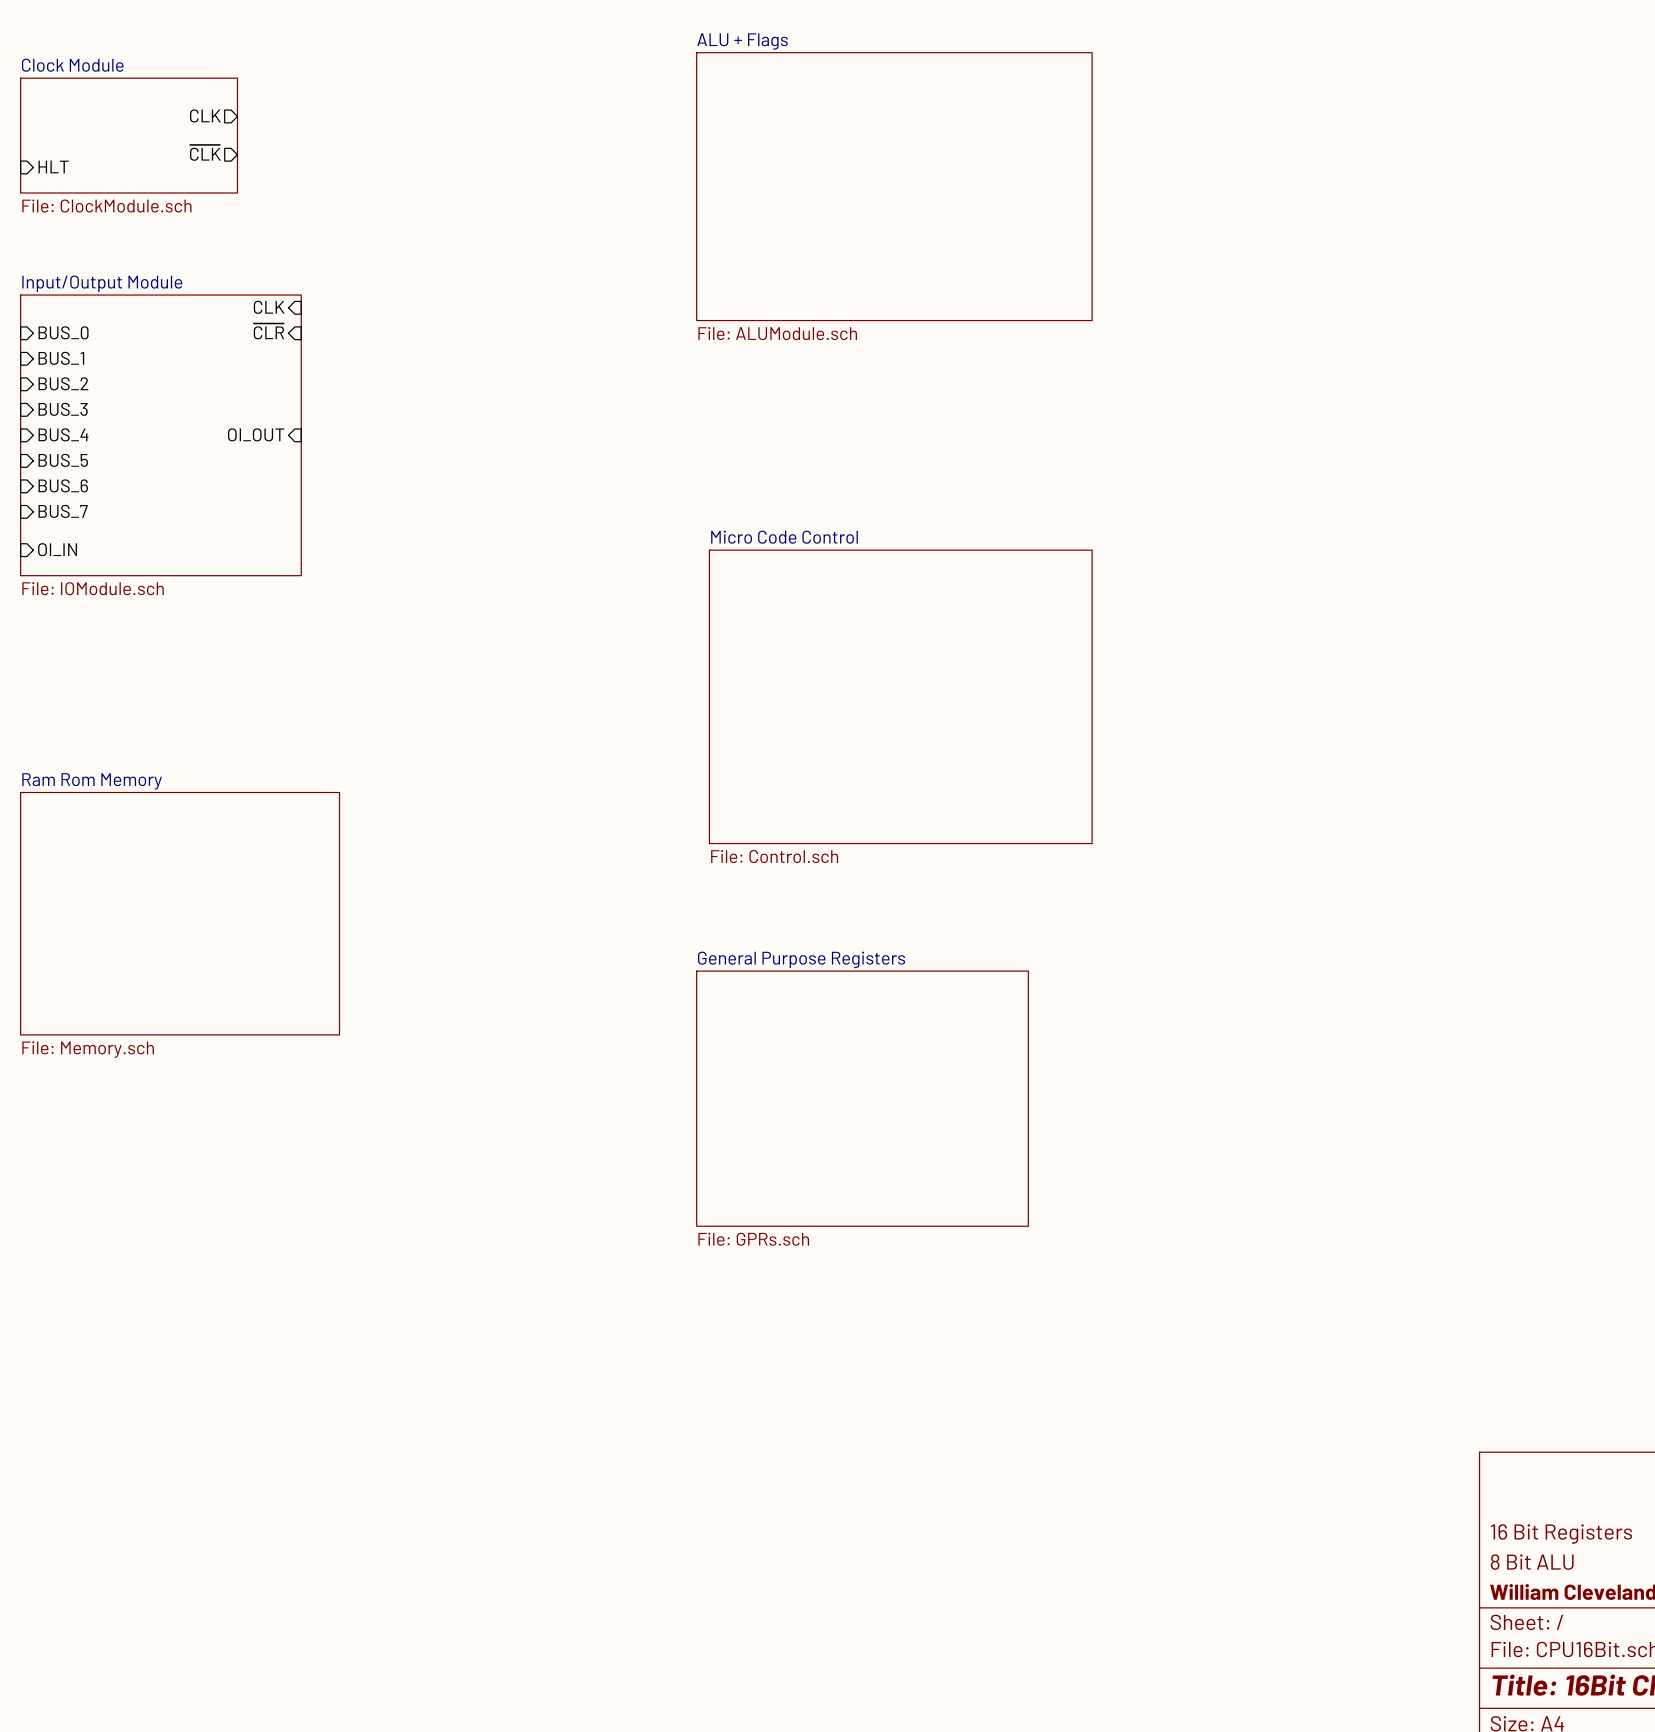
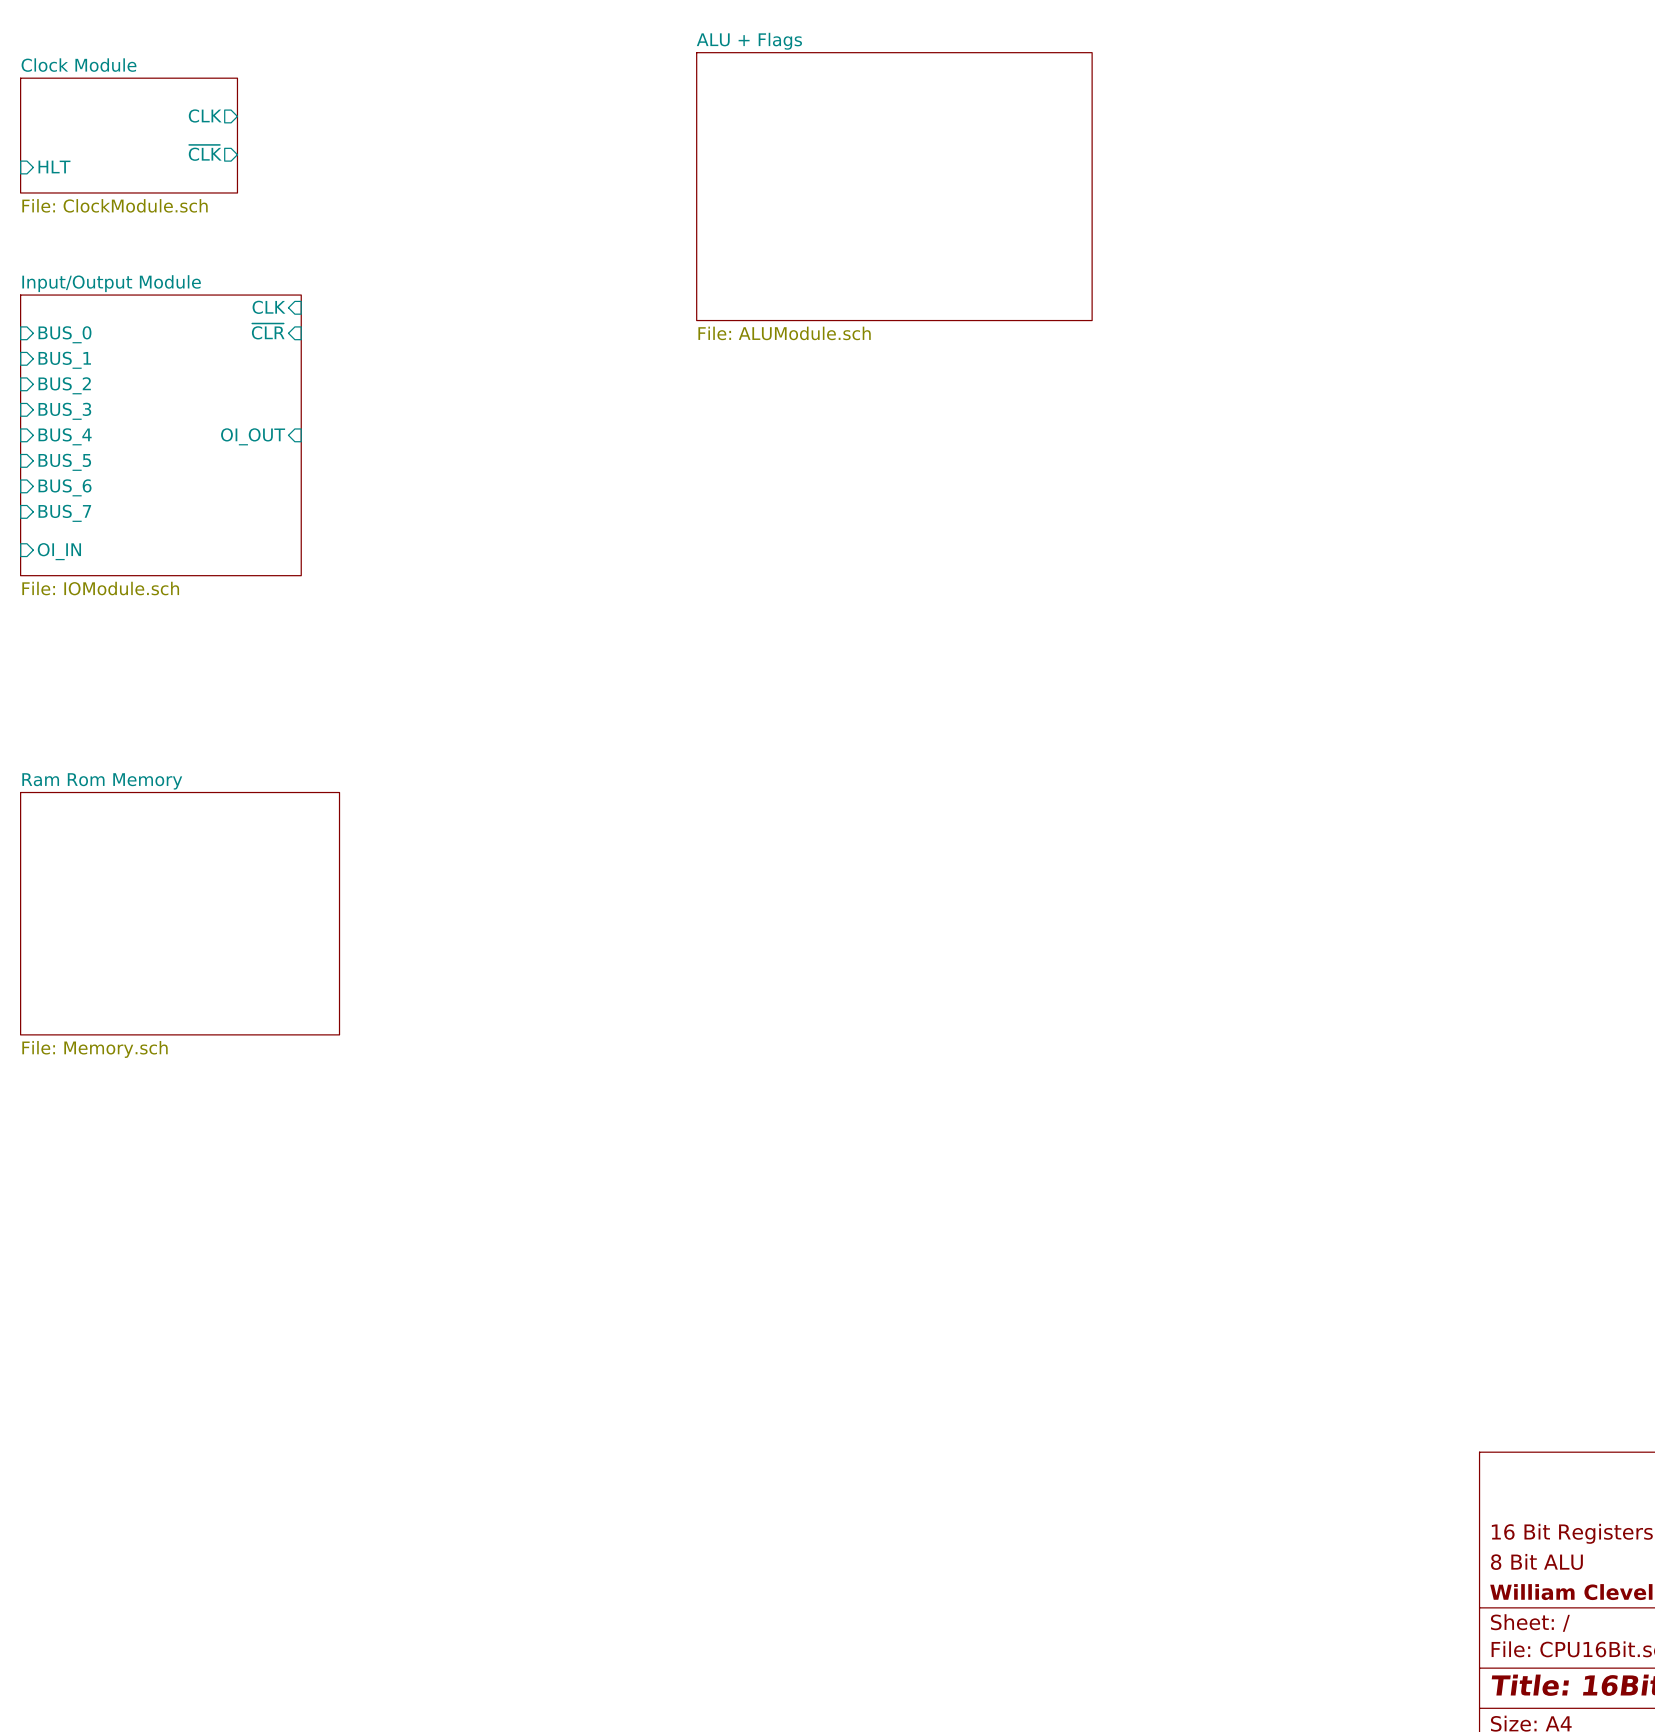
sheet Micro Code Control: File: Control.sch (900, 696) -> none
sheet General Purpose Registers: File: GPRs.sch (862, 1098) -> none

